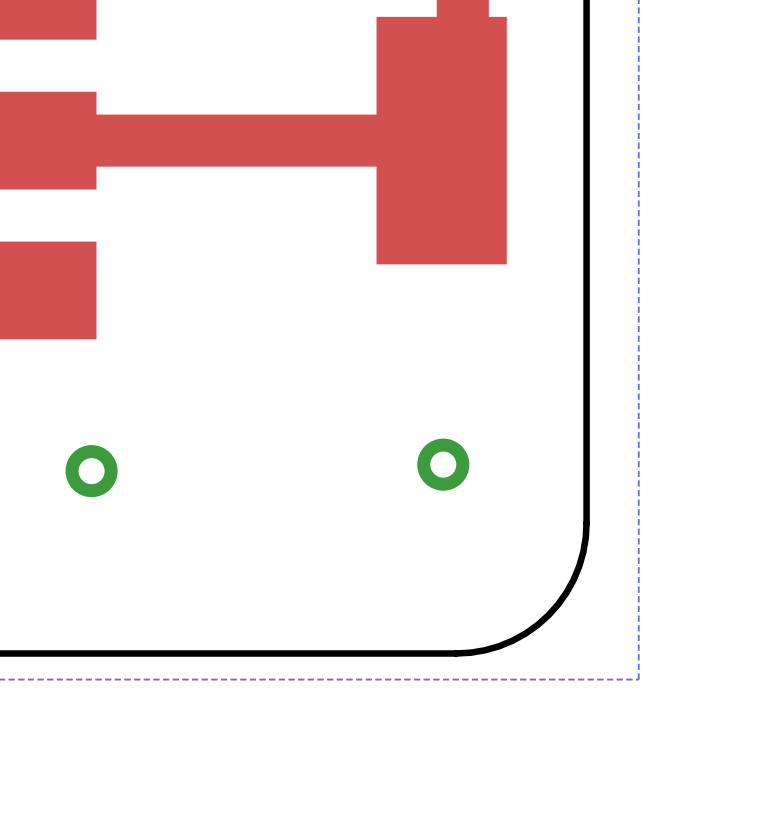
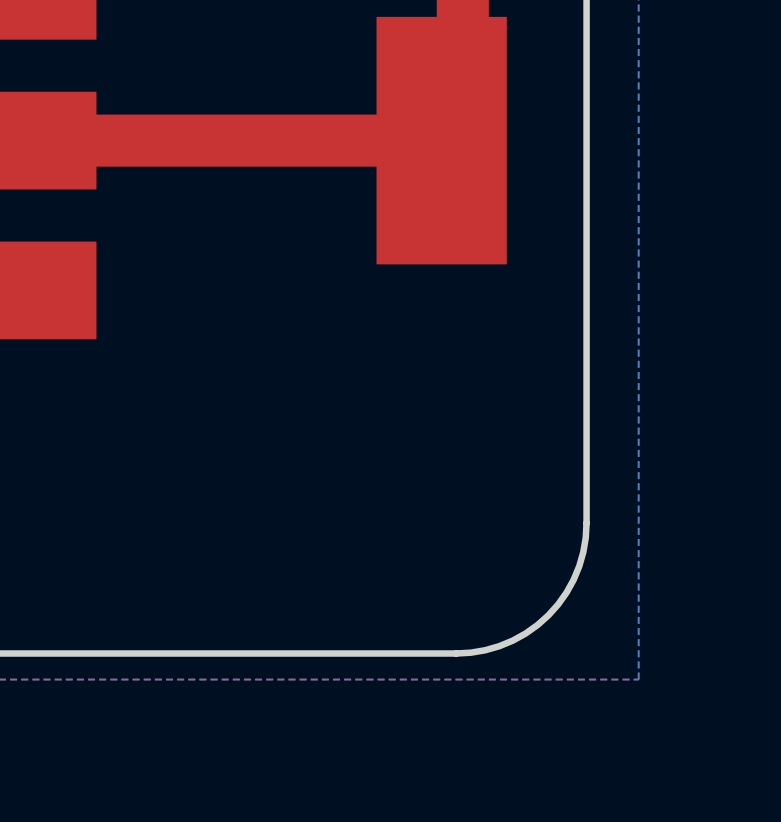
via: (443, 464) -> none
via: (91, 471) -> none

